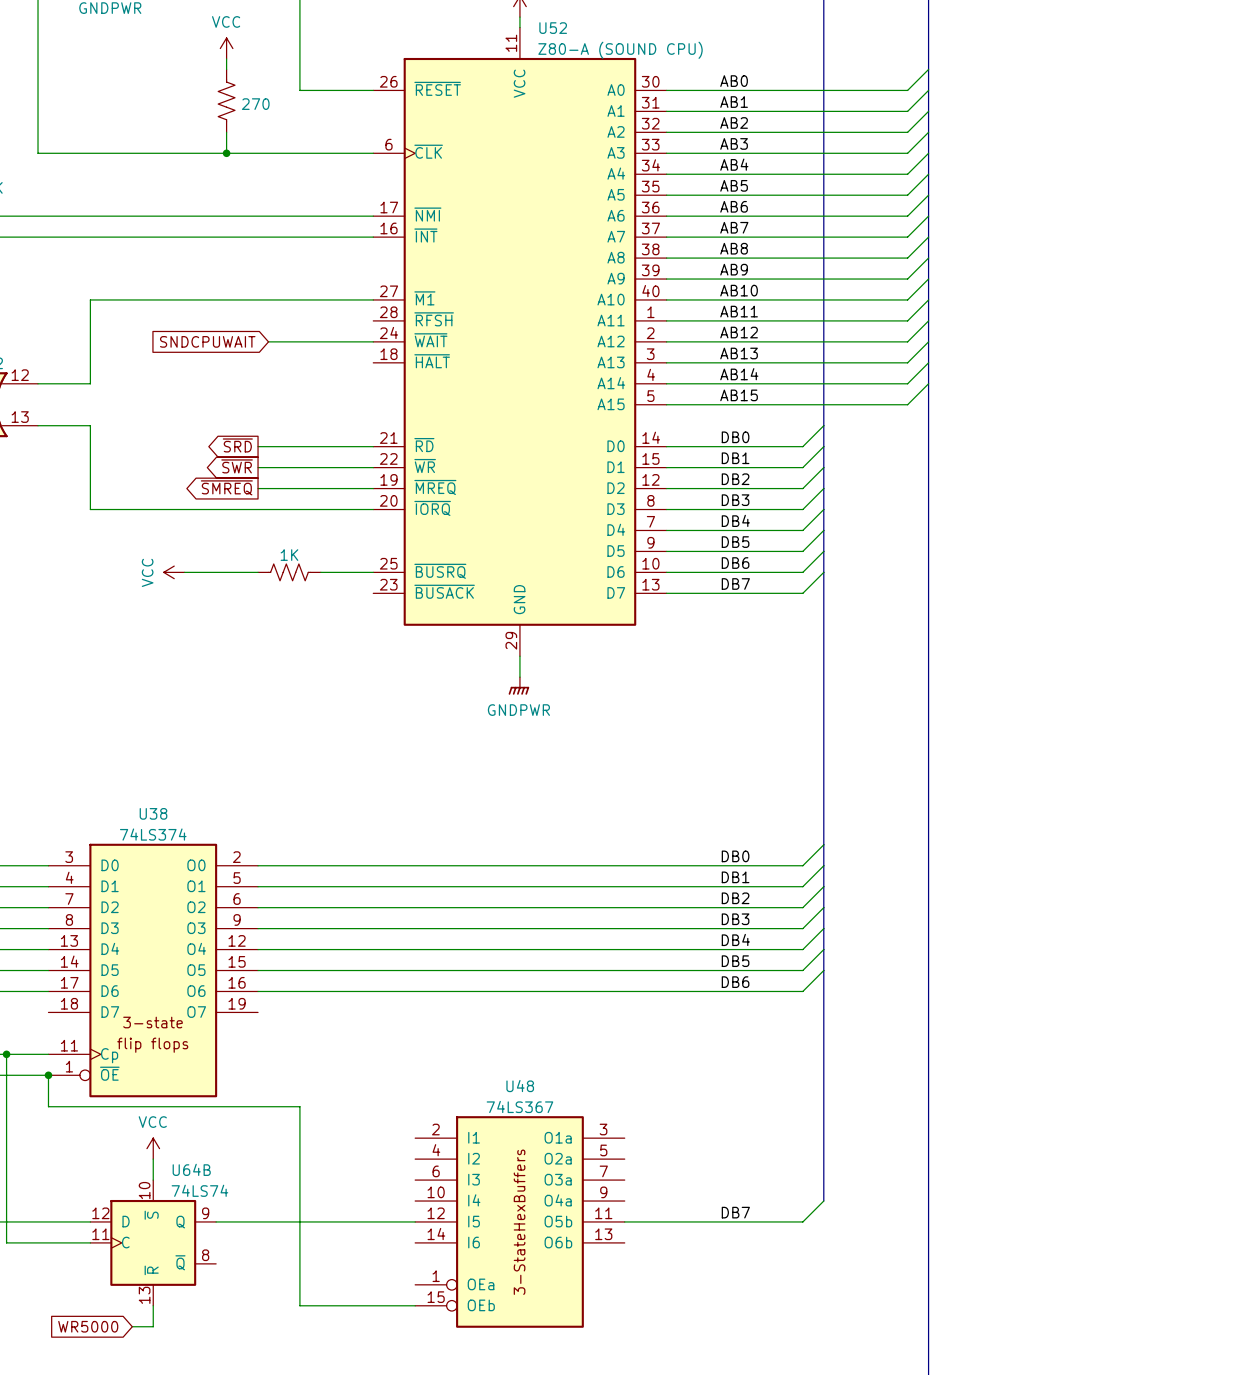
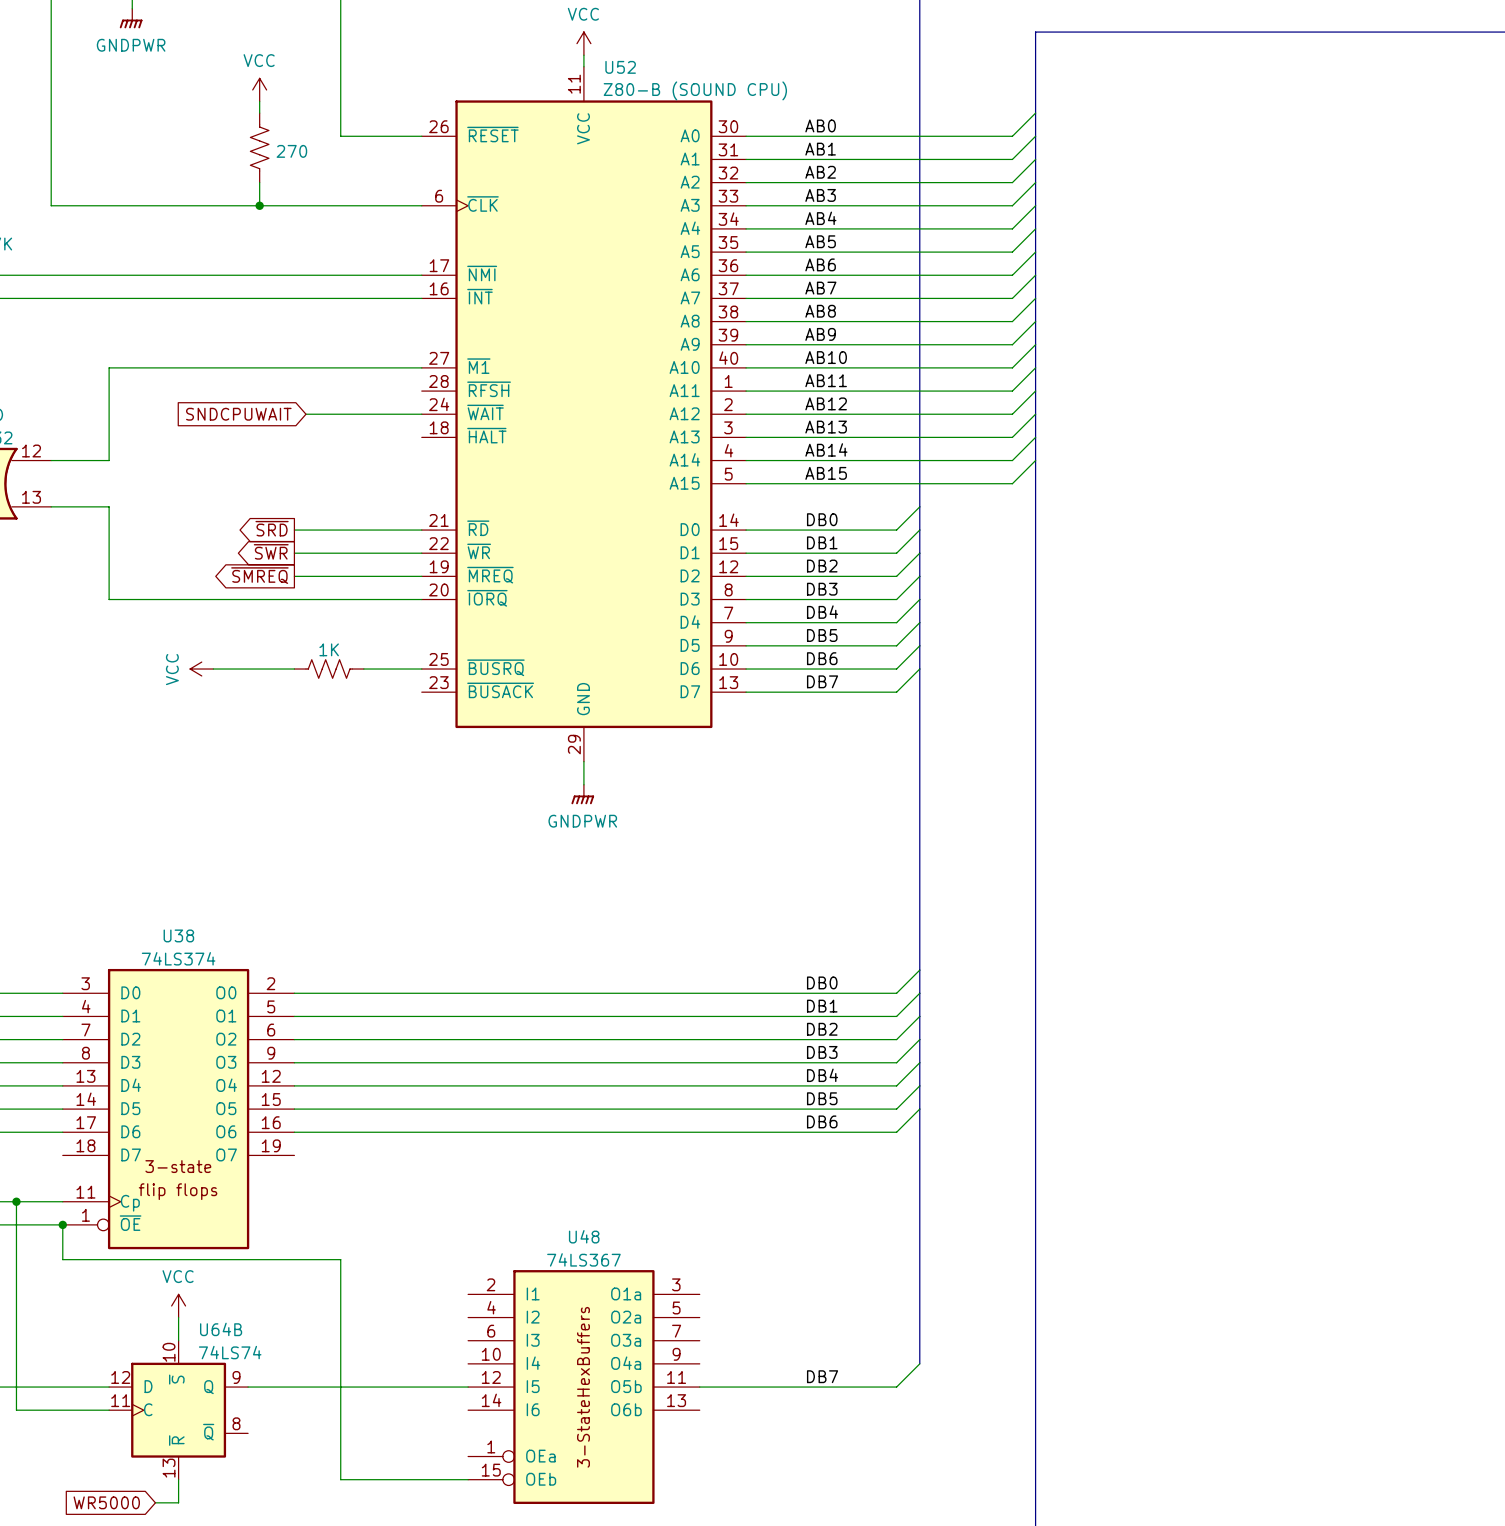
U52 value: Z80-A (SOUND CPU) (620, 50) -> Z80-B (SOUND CPU) (695, 90)

